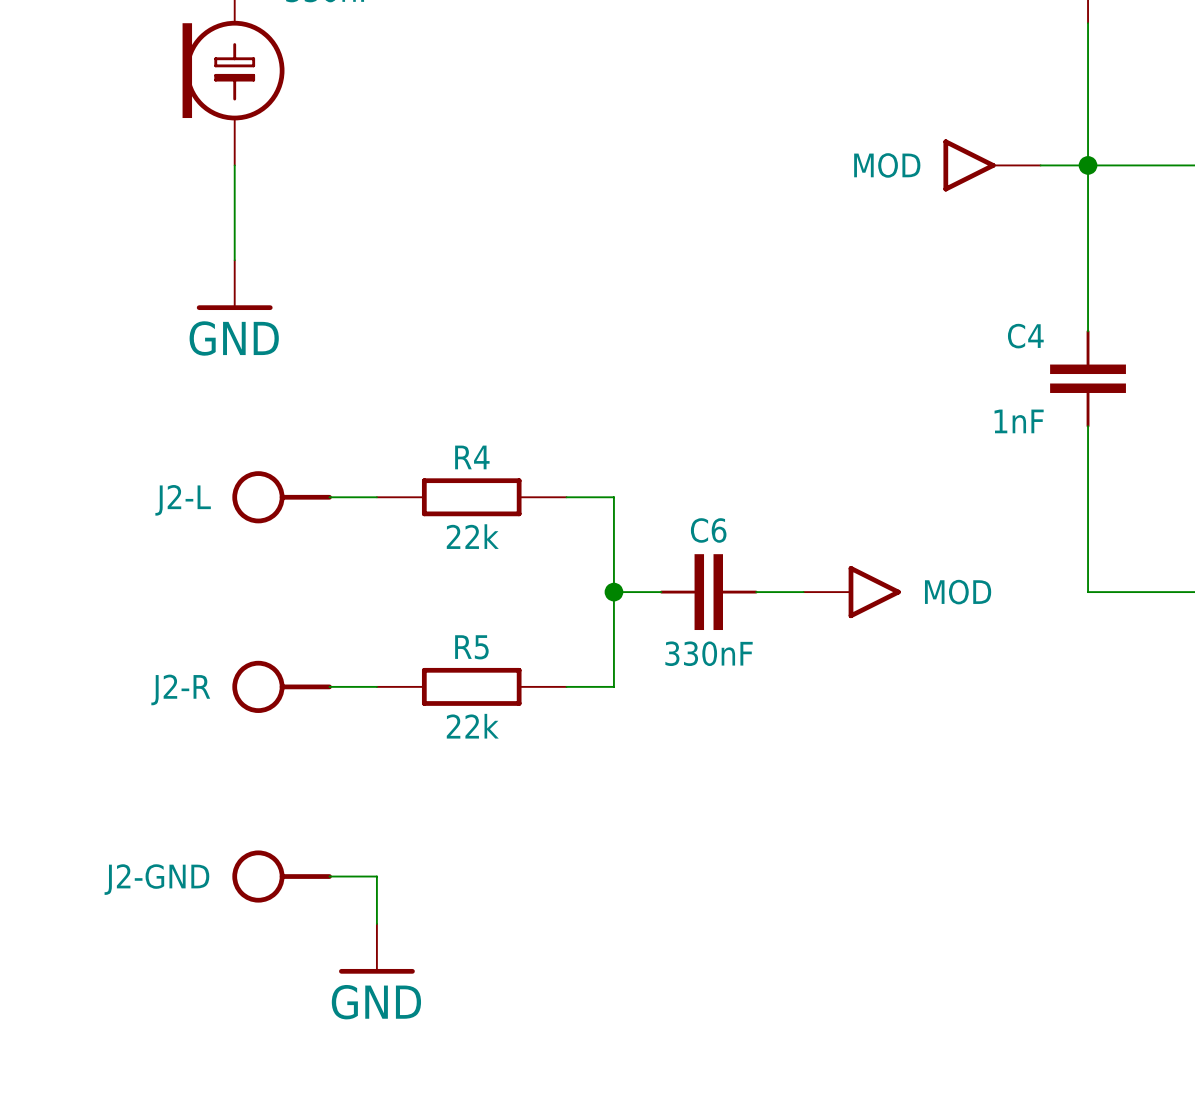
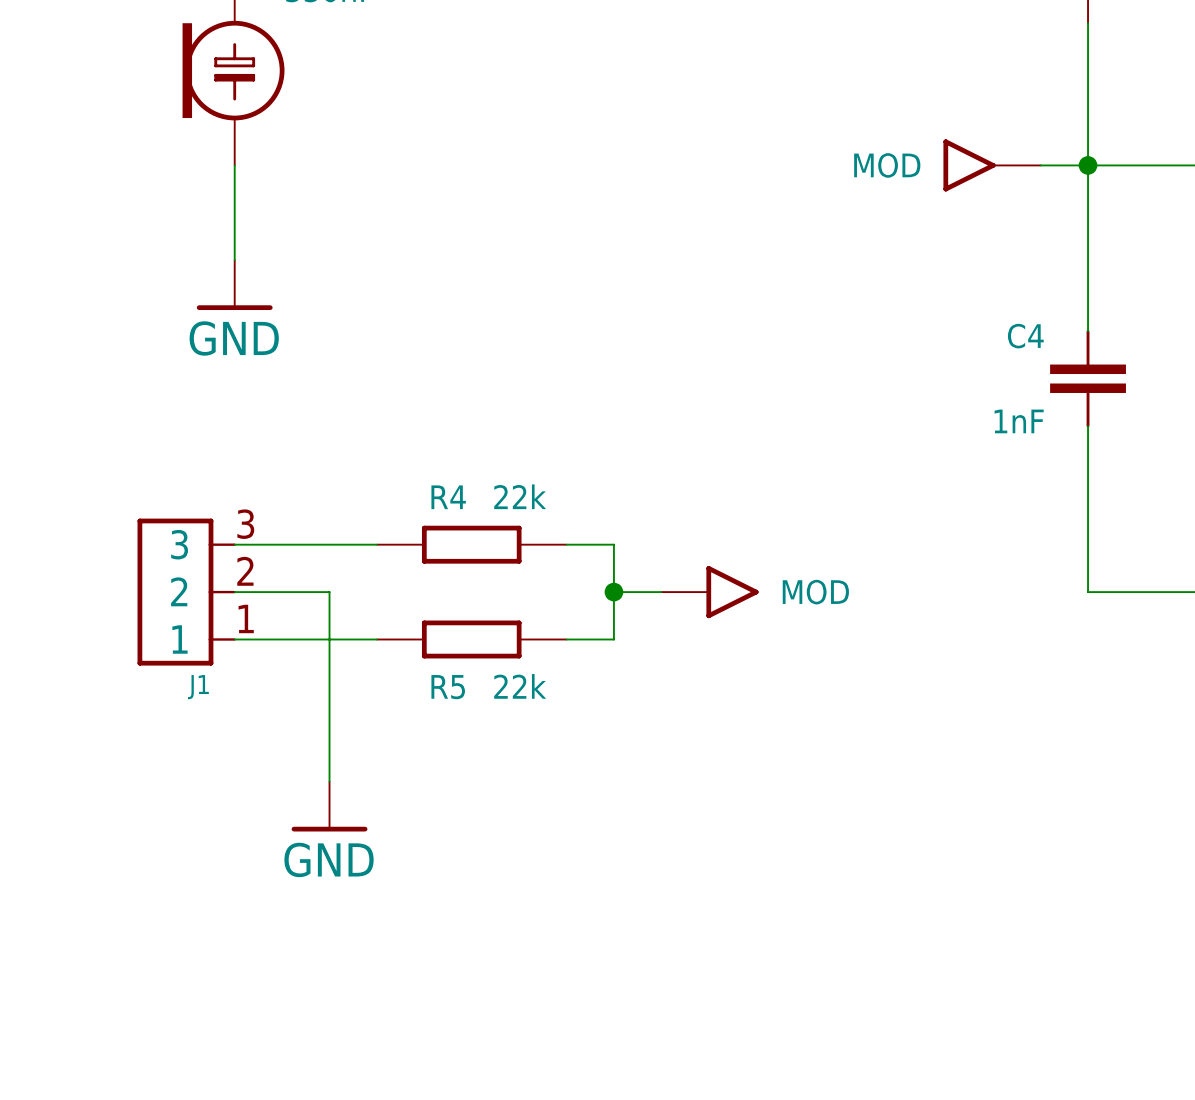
R4 name position: R4 (472, 457) -> R4 (448, 497)
J2-L: (282, 497) -> none
wire: (329, 497) (376, 497) -> none
R4 position: (471, 497) -> (471, 544)
wire: (566, 497) (613, 497) (613, 544) -> (566, 544) (613, 544)
R4 value position: 22k (472, 536) -> 22k (520, 496)
wire: none -> (234, 544) (376, 544)
J1: none -> (186, 592)
wire: none -> (234, 592) (329, 592) (329, 781)
C6: 330nF (708, 592) -> none
wire: (756, 592) (803, 592) -> none
power symbol position: MOD (852, 592) -> MOD (709, 592)
wire: none -> (234, 639) (376, 639)
wire: (613, 639) (613, 686) (566, 686) -> (613, 639) (566, 639)
R5 name position: R5 (471, 647) -> R5 (448, 687)
J2-R: (282, 686) -> none
wire: (329, 686) (376, 686) -> none
R5 position: (471, 686) -> (471, 639)
R5 value position: 22k (472, 726) -> 22k (520, 686)
J2-GND: (282, 876) -> none
wire: (329, 876) (376, 876) (376, 923) -> none
power symbol position: GND (376, 948) -> GND (329, 806)

